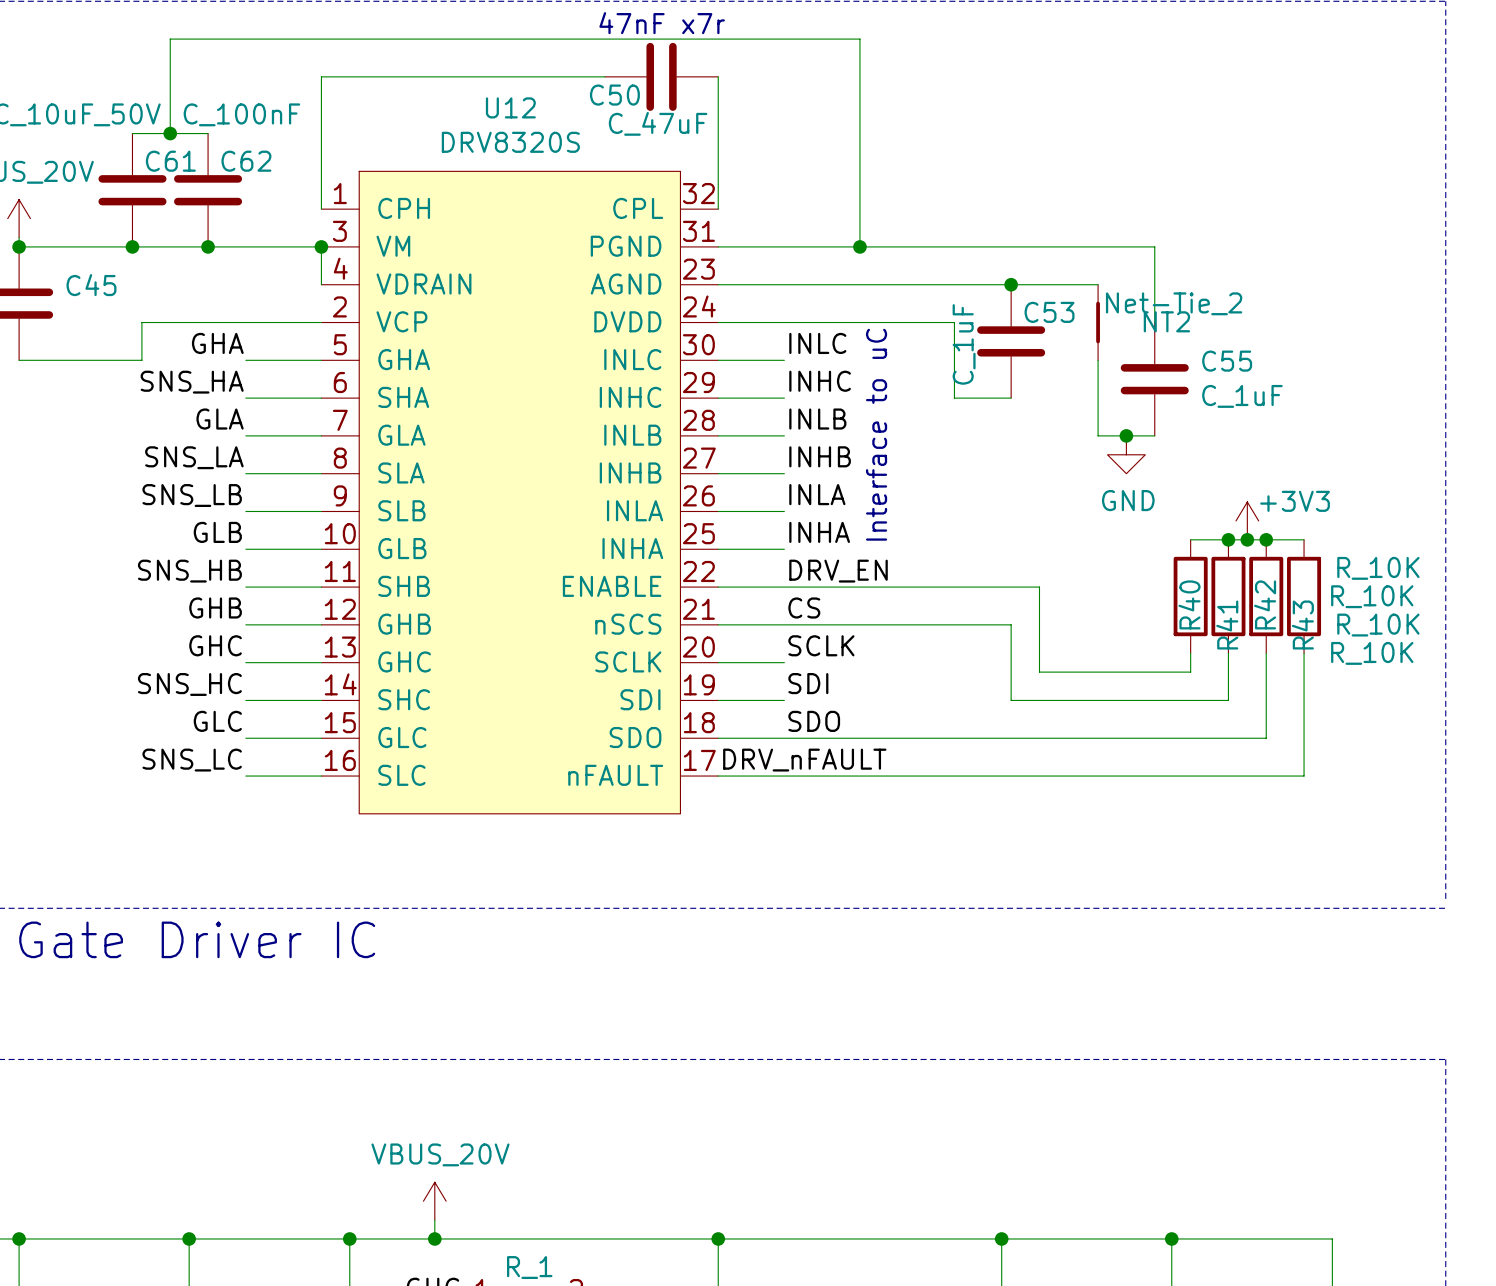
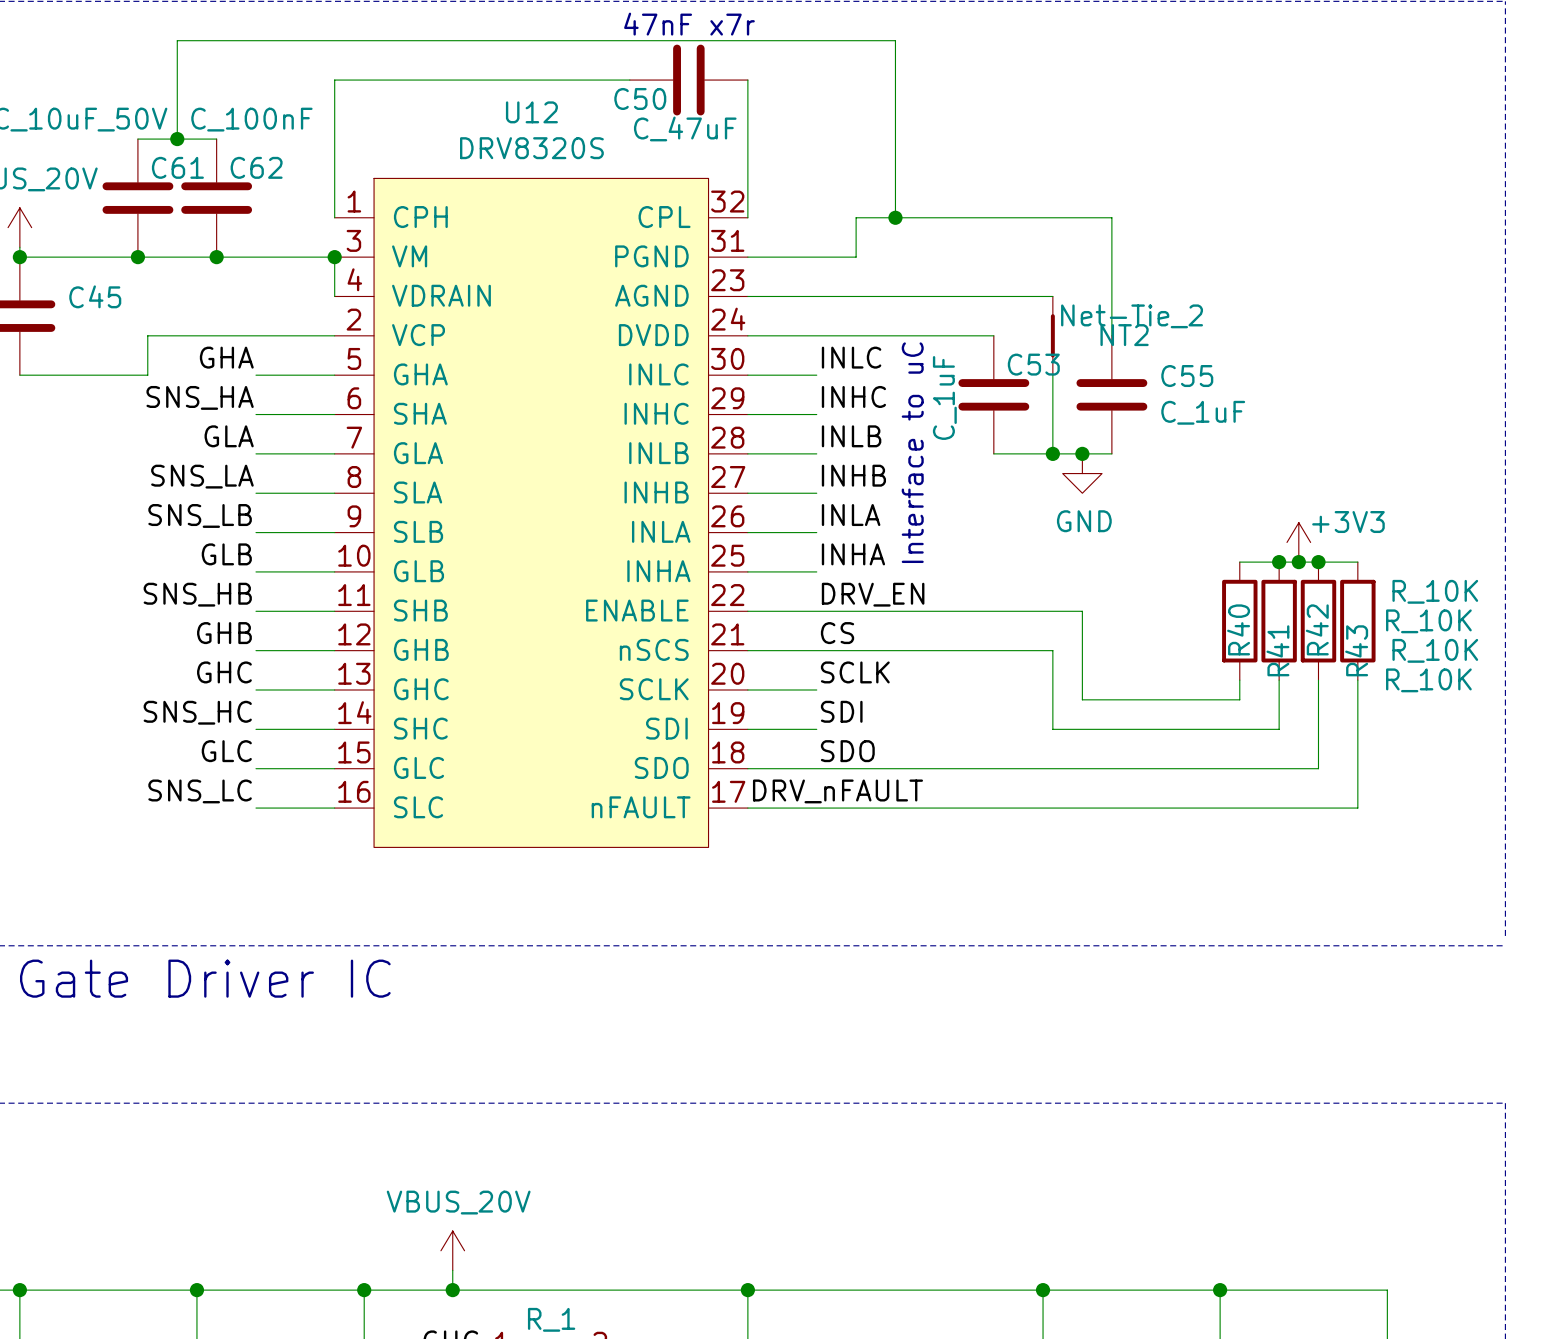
wire: (859, 209) (859, 246) -> none
wire: (822, 246) (1154, 246) (1154, 322) -> (856, 257) (856, 217) (1111, 217) (1111, 335)
junction position: (859, 246) -> (895, 217)
wire: (1011, 284) (1098, 284) -> none
junction: (1011, 284) -> none
wire: (954, 322) (954, 398) (1011, 398) -> none
NT2 position: (1098, 322) -> (1052, 335)
C53 position: (1011, 341) -> (993, 394)
wire: none -> (1052, 375) (1052, 453)
wire: (1098, 360) (1098, 435) (1154, 435) -> none
C55 position: (1154, 379) -> (1111, 394)
wire: none -> (993, 453) (1111, 453)
junction: none -> (1052, 453)
junction: none -> (1082, 453)
junction: (1126, 435) -> none
power symbol position: GND (1126, 454) -> GND (1082, 473)

